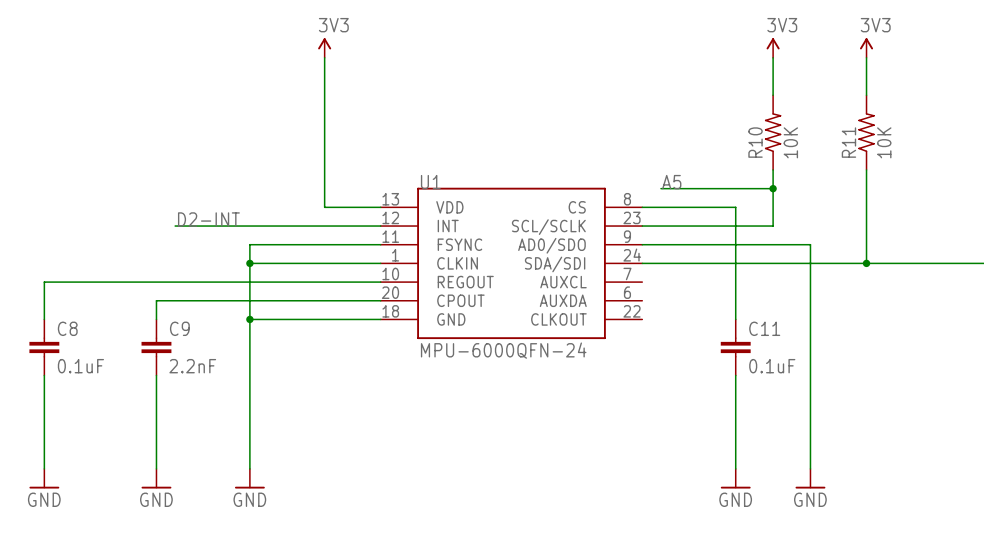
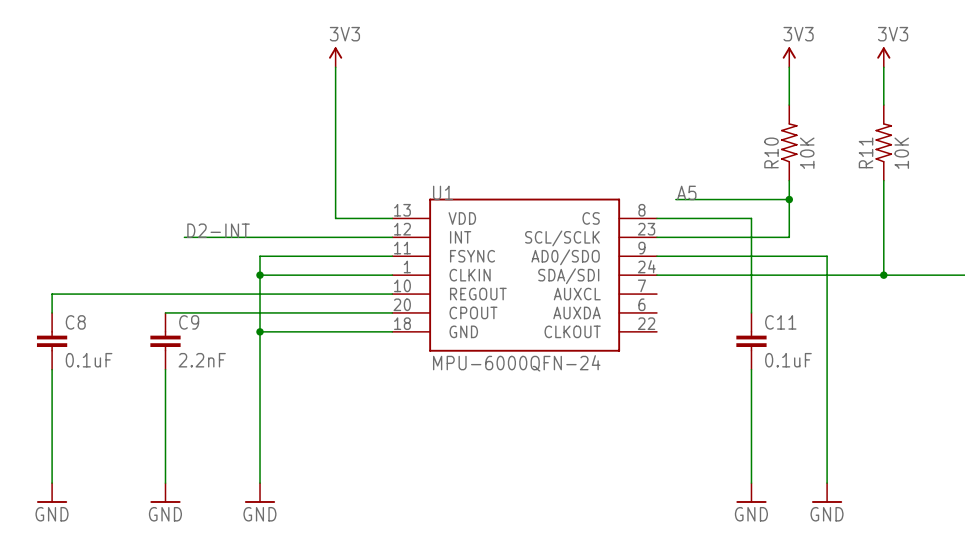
C8 position: (44, 347) -> (52, 341)
C9 position: (156, 347) -> (165, 341)
C11 position: (735, 347) -> (751, 341)

